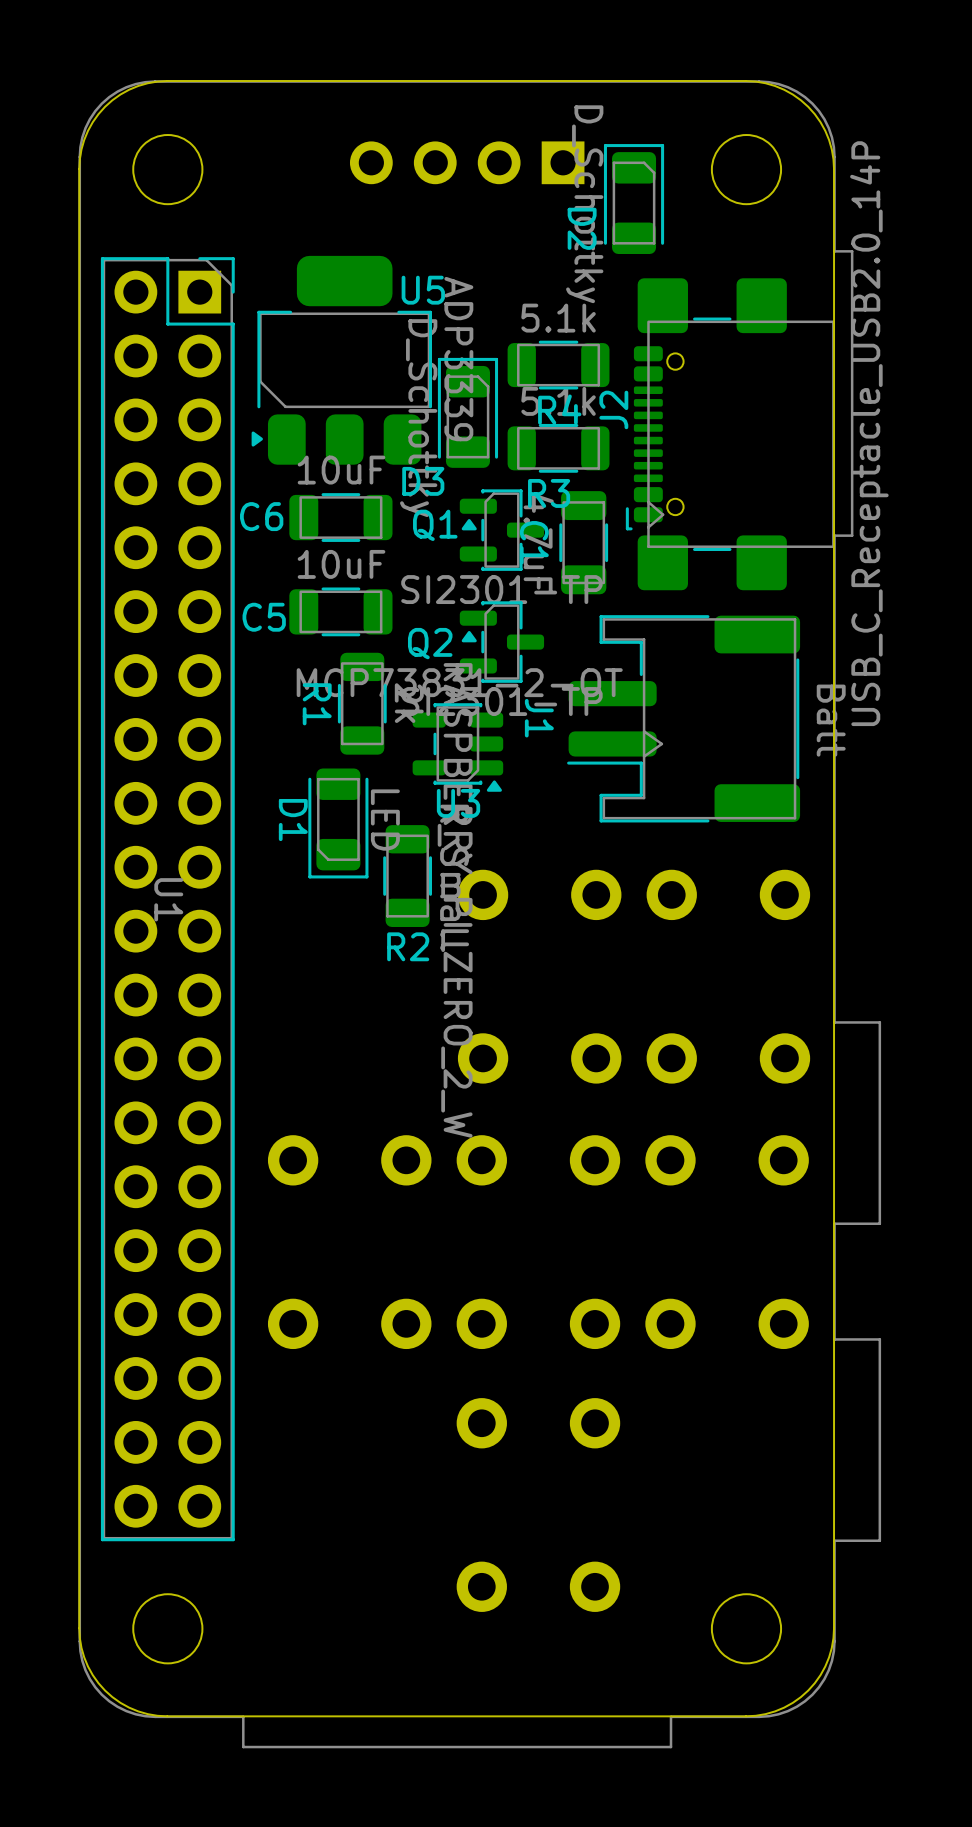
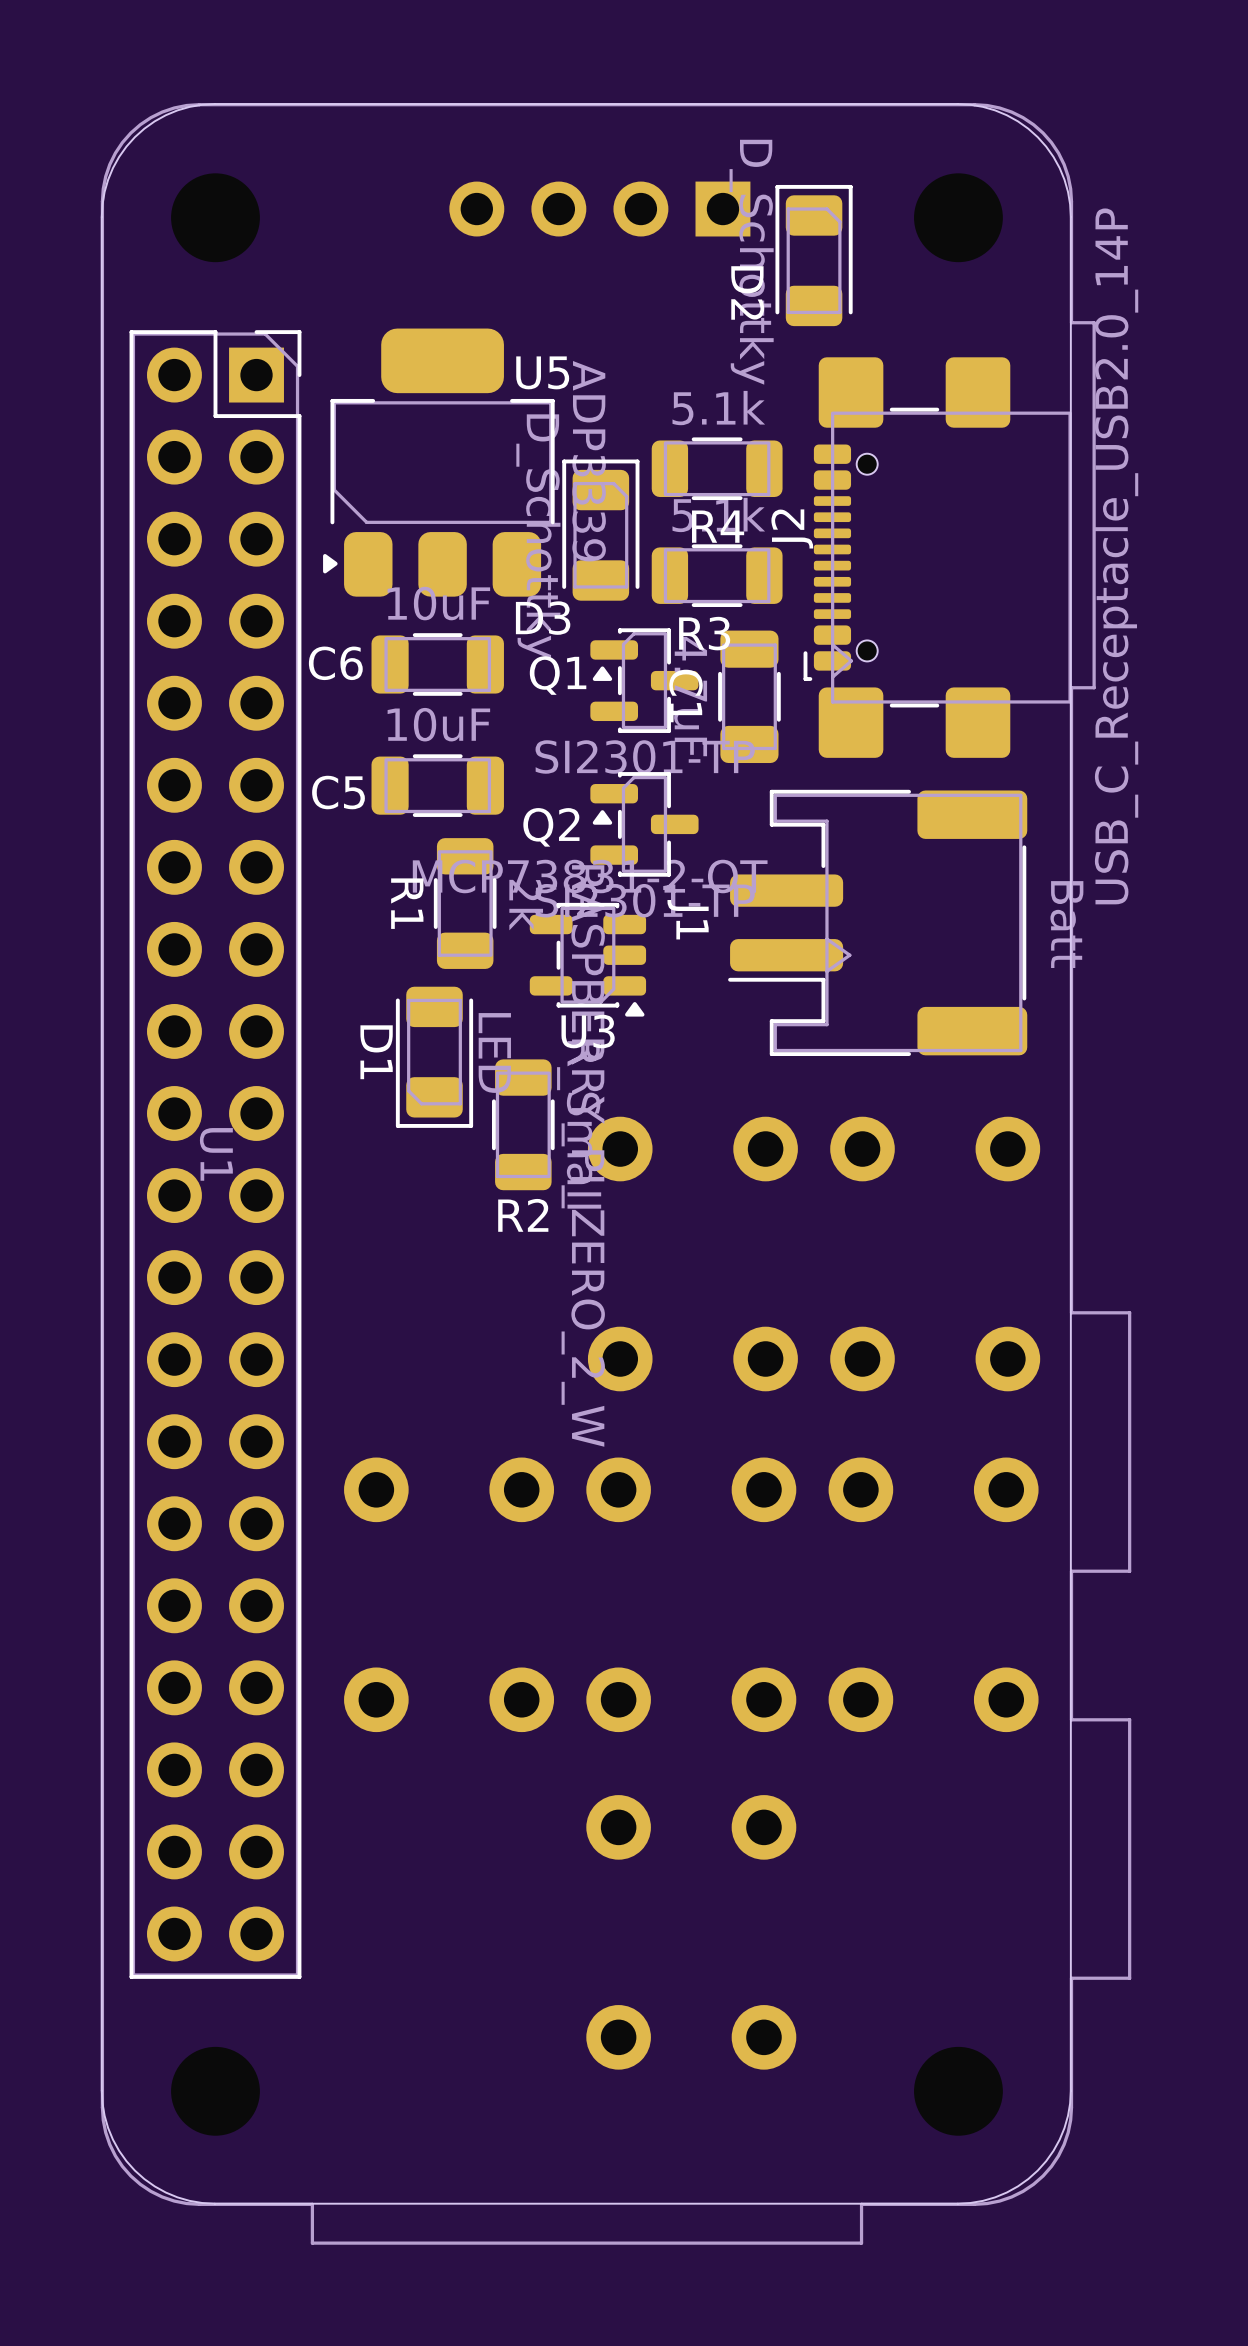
U1 footprint: [78, 80, 882, 1749] -> [100, 103, 1132, 2245]

